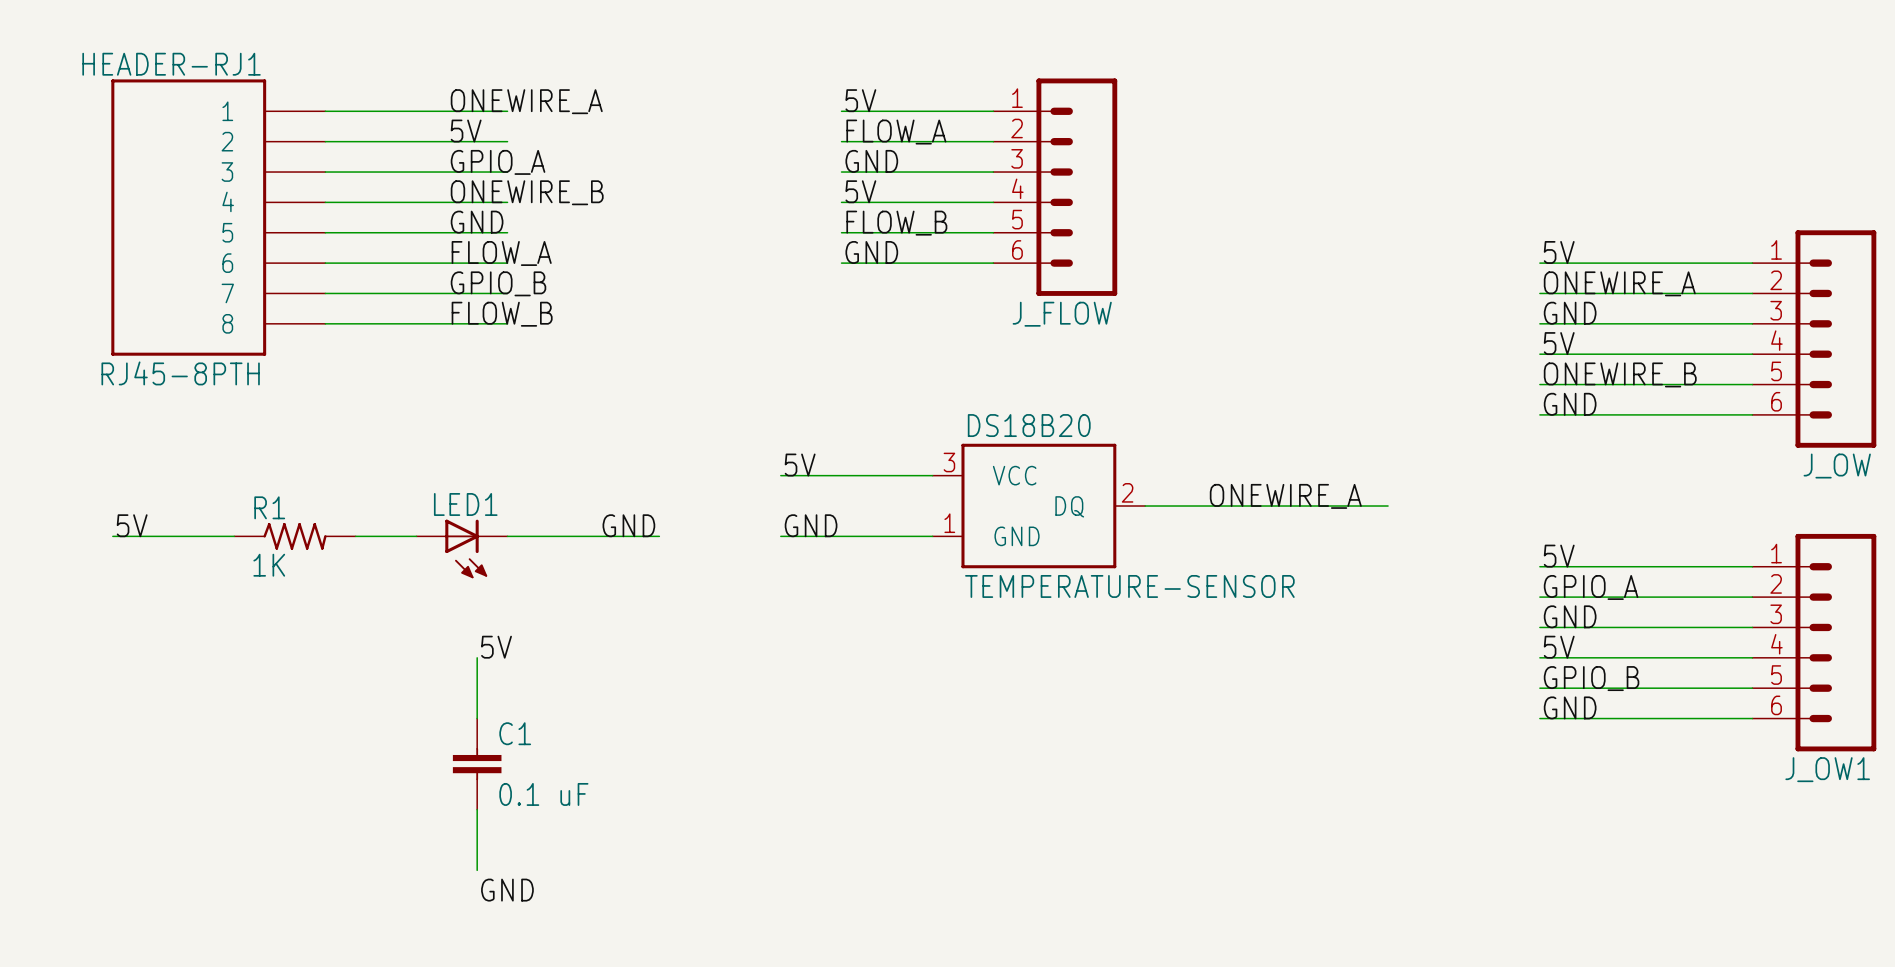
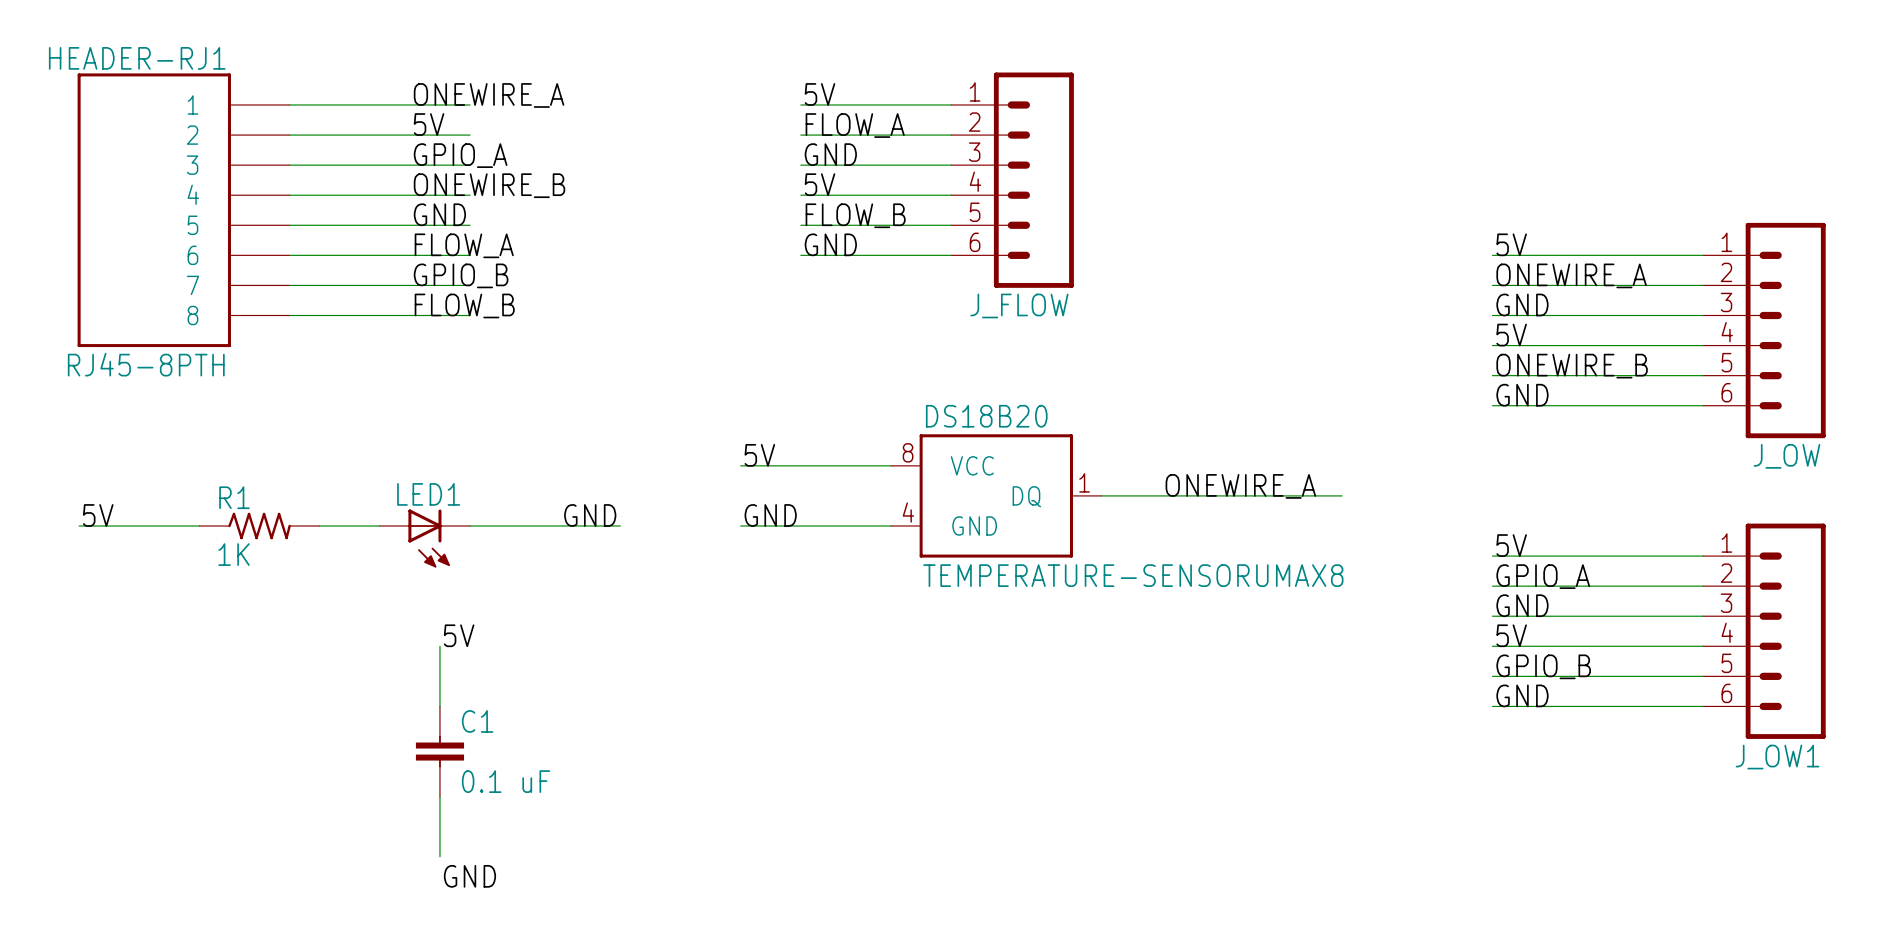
part pin number: 3 (949, 462) -> 8 (908, 452)
part pin number: 2 (1127, 492) -> 1 (1084, 482)
part pin number: 1 (949, 523) -> 4 (908, 512)
part value: TEMPERATURE-SENSOR (1129, 586) -> TEMPERATURE-SENSORUMAX8 (1133, 575)

